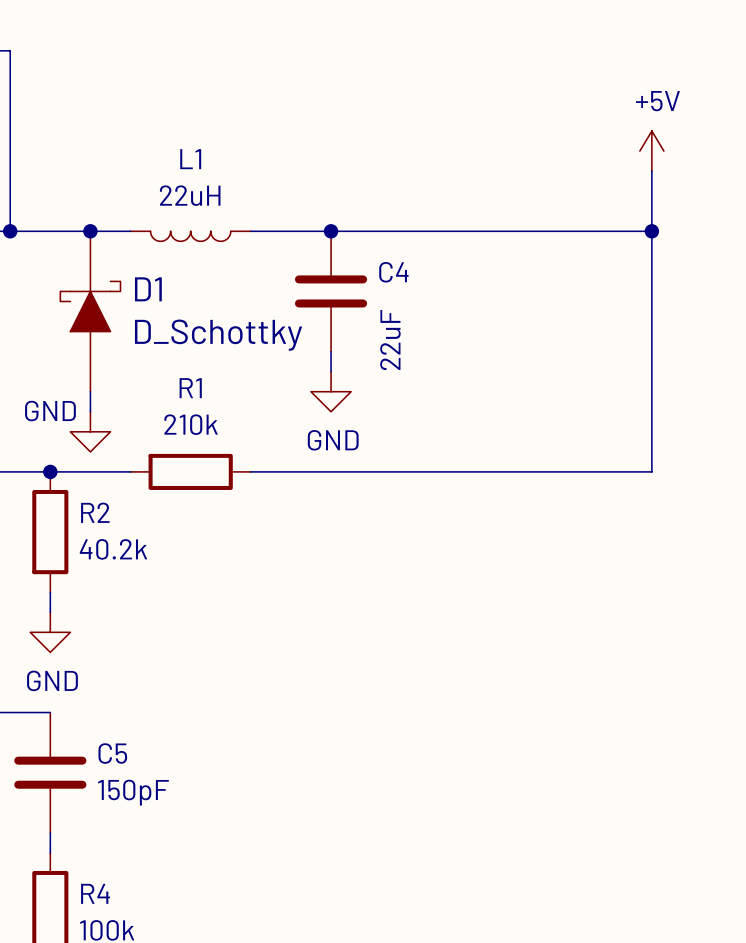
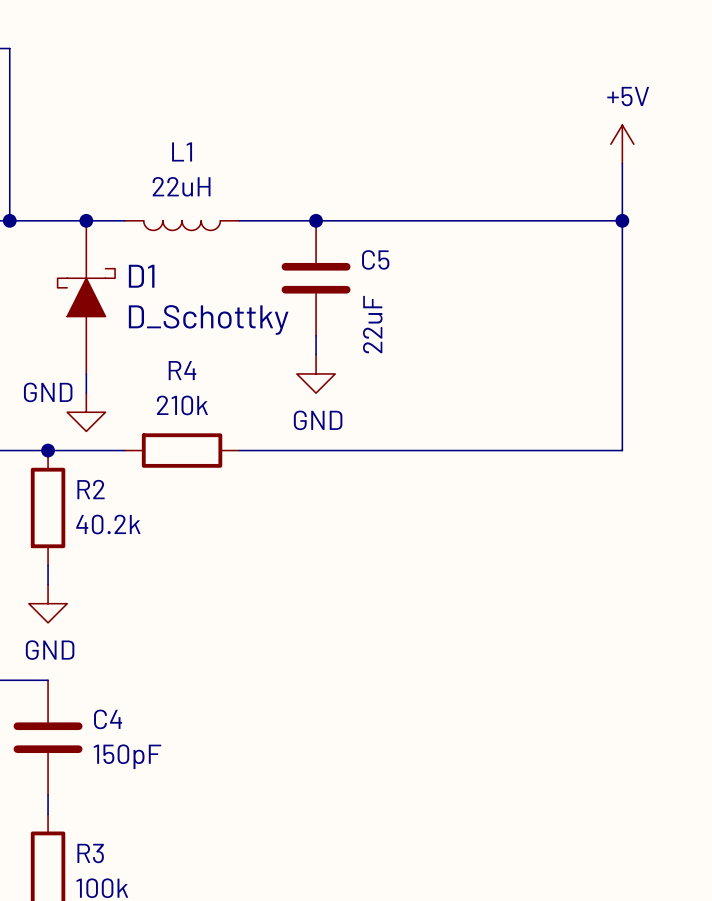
C4 name: C4 (393, 272) -> C5 (375, 259)
R1 name: R1 (190, 388) -> R4 (182, 370)
C5 name: C5 (112, 753) -> C4 (108, 719)
R4 name: R4 (95, 893) -> R3 (90, 853)

